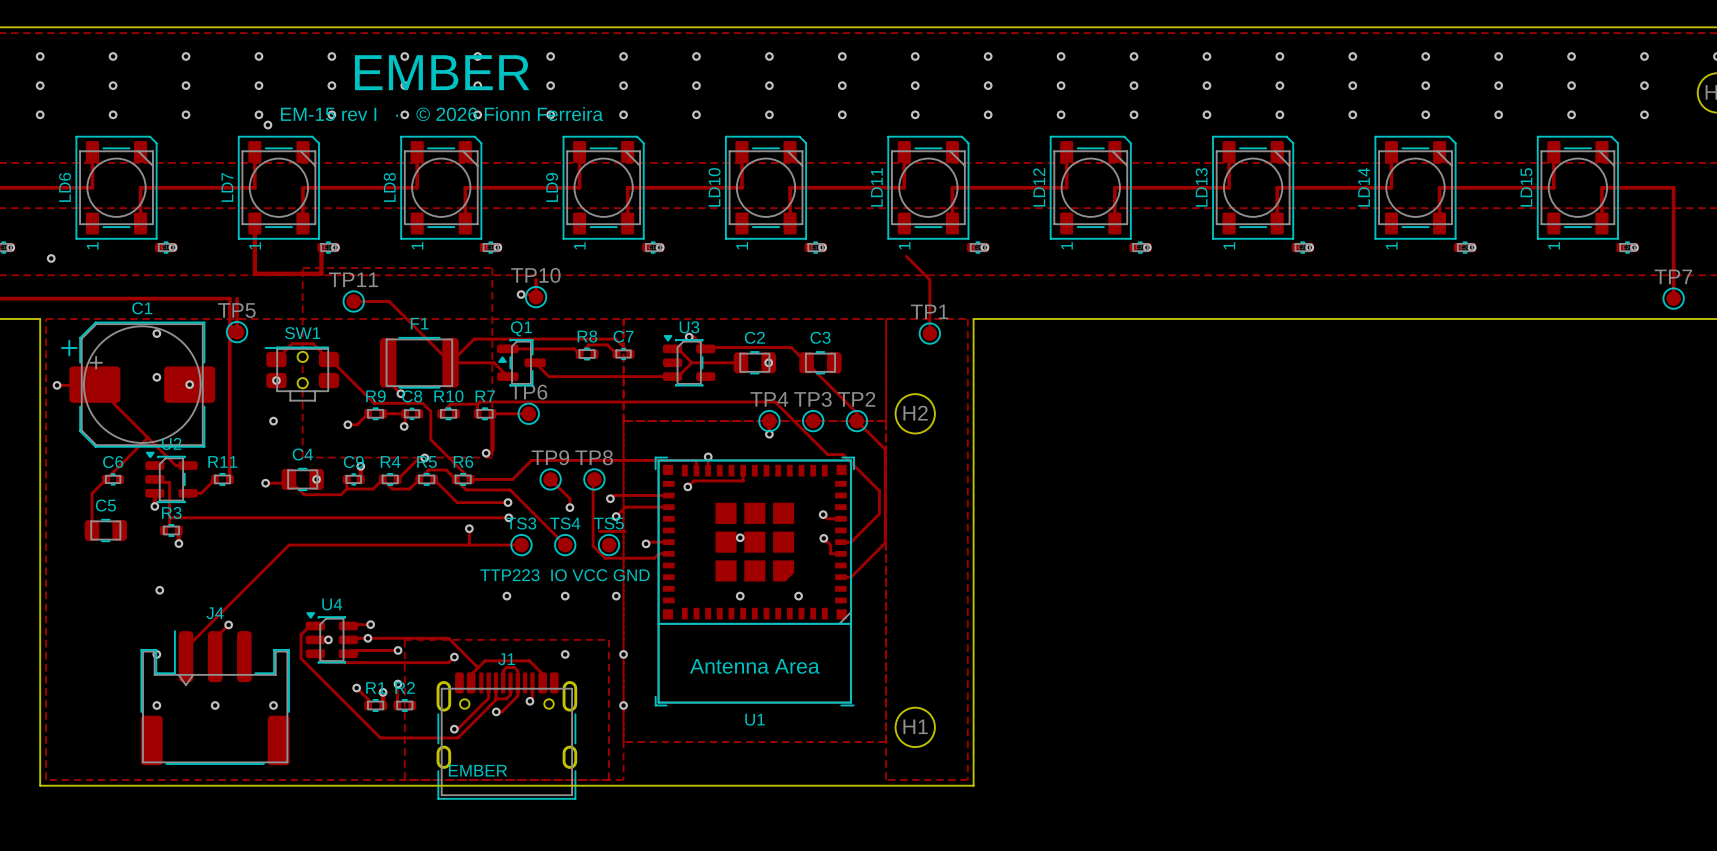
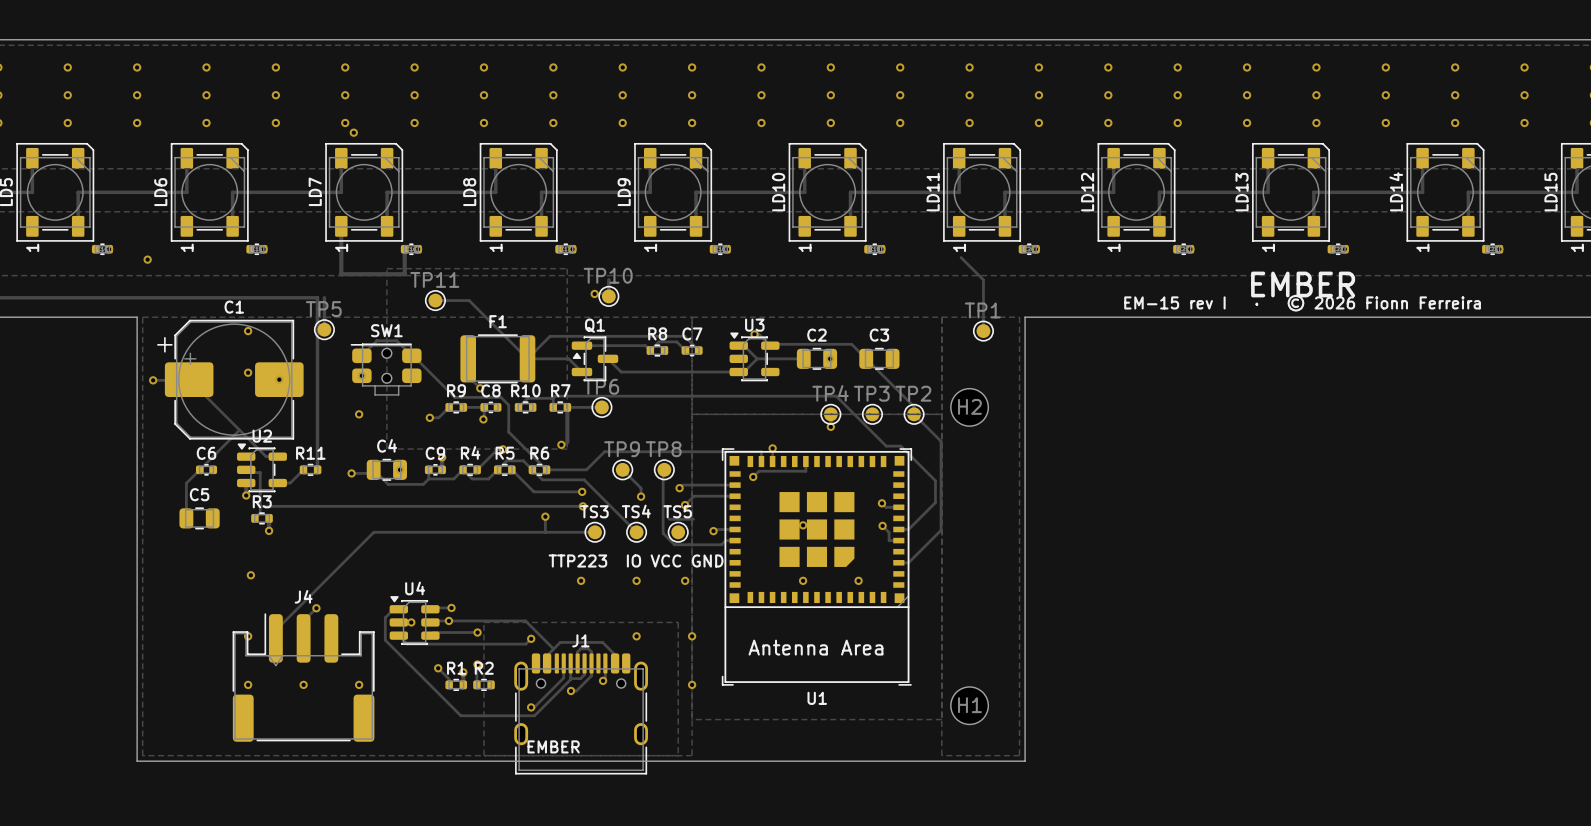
text: EMBER (442, 72) -> none
text: EM-15 rev I · © 2026 Fionn Ferreira (442, 114) -> none
text: none -> EMBER (1303, 284)
text: none -> EM-15 rev I · © 2026 Fionn Ferreira (1302, 303)

